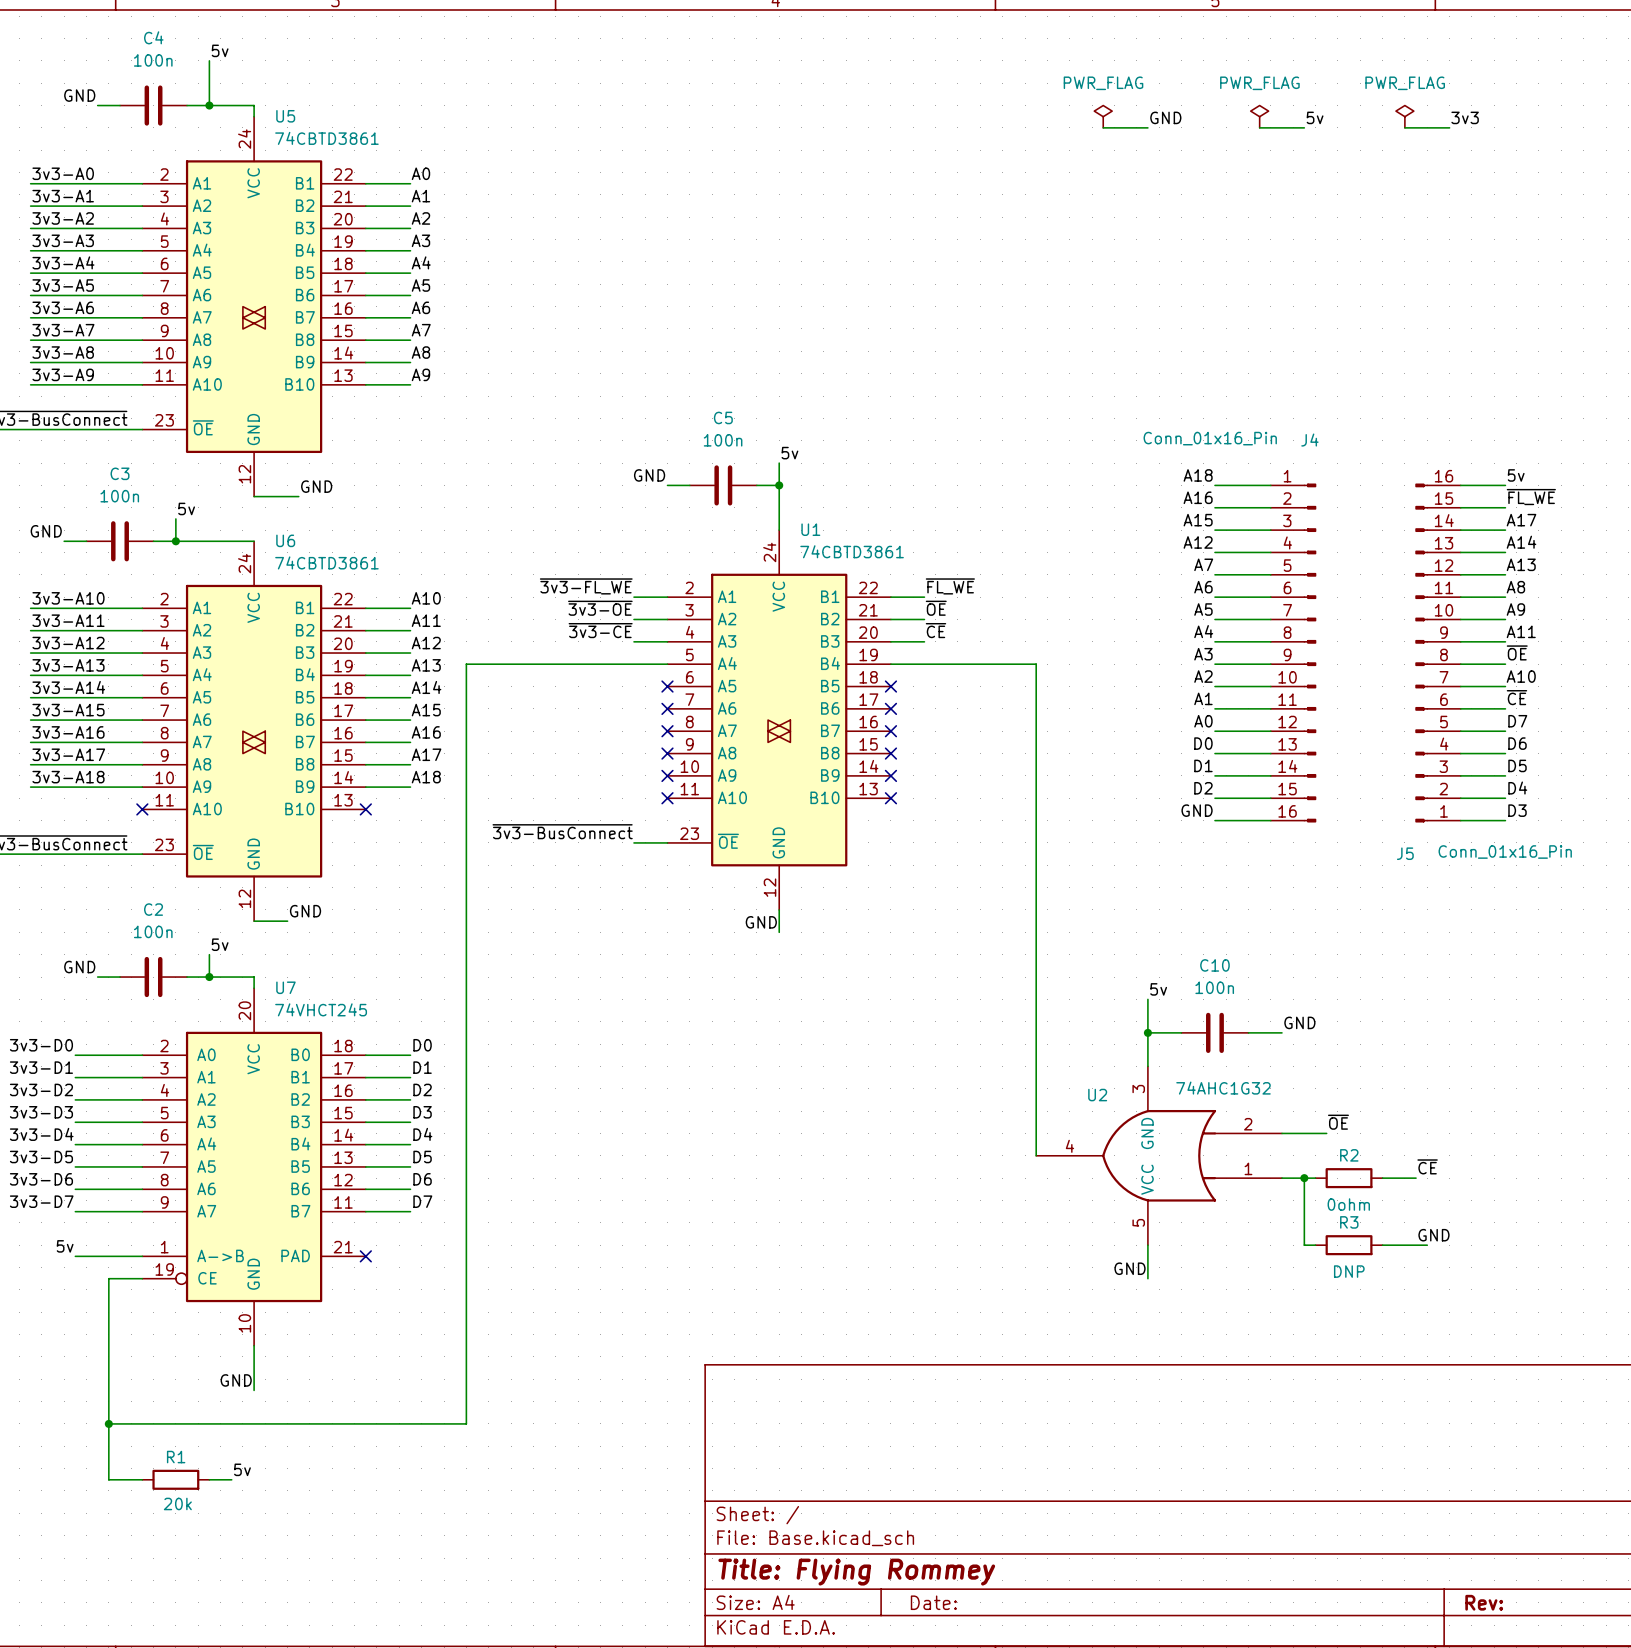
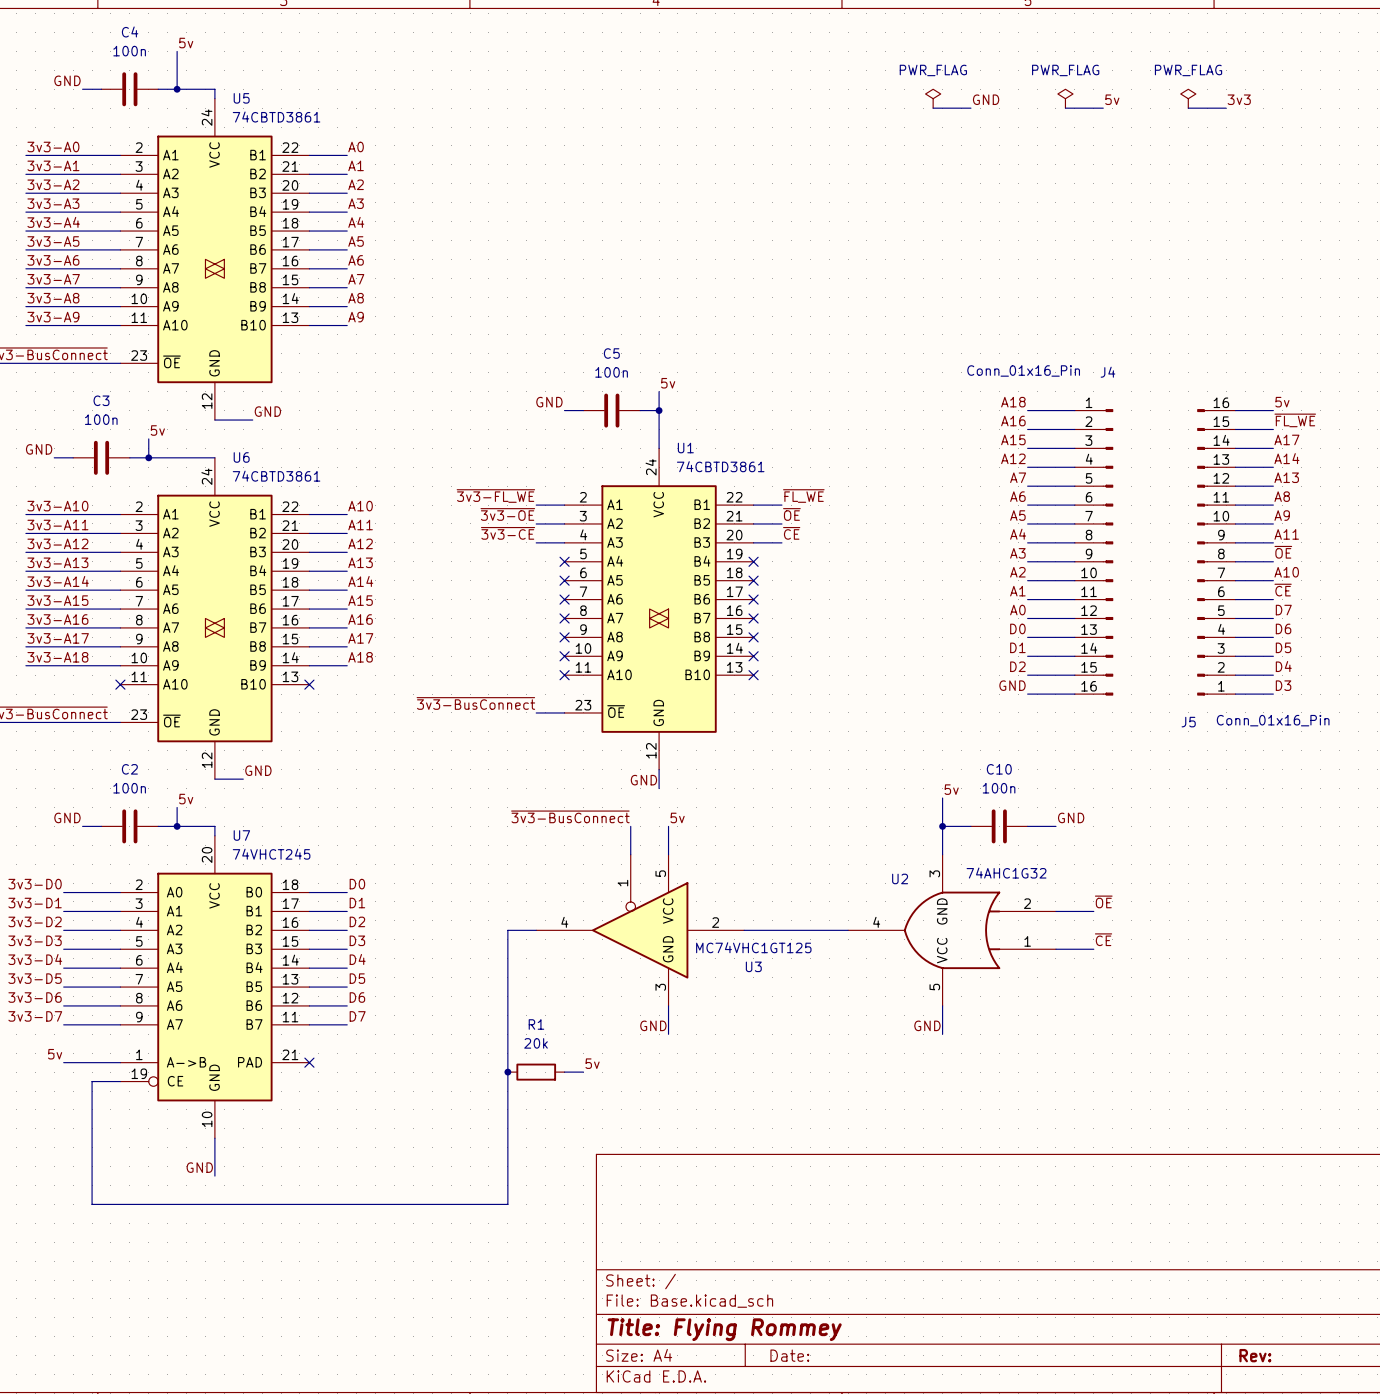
wire: (667, 664) (466, 664) (466, 1423) -> (536, 930) (507, 930) (507, 1204) (394, 1204)
no-connect mark: none -> (564, 561)
wire: (890, 664) (1036, 664) (1036, 1155) -> none
no-connect mark: none -> (753, 561)
label: none -> ~{3v3-BusConnect} (570, 816)
label: none -> 5v (677, 817)
wire: none -> (630, 826) (630, 854)
wire: none -> (668, 826) (668, 854)
junction: none -> (942, 826)
label position: 5v (1158, 989) -> 5v (951, 789)
wire: (1147, 999) (1147, 1066) -> (942, 798) (942, 854)
label position: GND (1299, 1022) -> GND (1071, 817)
wire: (1147, 1032) (1181, 1032) -> (942, 826) (970, 826)
junction: (1147, 1032) -> none
C10 position: (1214, 1032) -> (999, 826)
wire: (1248, 1032) (1281, 1032) -> (1027, 826) (1055, 826)
U3: none -> MC74VHC1GT125 (640, 930)
wire: none -> (744, 930) (848, 930)
label position: ~{OE} (1338, 1122) -> ~{OE} (1103, 901)
wire: (1281, 1133) (1326, 1133) -> (1055, 911) (1093, 911)
U2 position: (1159, 1155) -> (952, 930)
label position: ~{CE} (1427, 1166) -> ~{CE} (1103, 939)
wire: (1281, 1178) (1315, 1178) -> none
wire: (1304, 1178) (1304, 1245) (1315, 1245) -> none
junction: (1304, 1178) -> none
R2: 0ohm (1349, 1178) -> none
wire: (1382, 1178) (1416, 1178) -> none
wire: none -> (668, 1005) (668, 1034)
label: none -> GND (653, 1025)
label: GND (1433, 1235) -> none
wire: (1147, 1245) (1147, 1278) -> (942, 1005) (942, 1034)
R3: DNP (1349, 1245) -> none
wire: (1382, 1245) (1427, 1245) -> (1055, 949) (1093, 949)
label: none -> 5v (592, 1063)
junction: none -> (507, 1072)
wire: none -> (564, 1072) (583, 1072)
label position: GND (1130, 1268) -> GND (927, 1025)
wire: (108, 1423) (108, 1479) (142, 1479) -> none
junction: (108, 1423) -> none
R1 name position: R1 (176, 1457) -> R1 (536, 1024)
label: 5v (242, 1469) -> none
R1 position: (175, 1479) -> (536, 1072)
wire: (209, 1479) (231, 1479) -> none
R1 value position: 20k (177, 1503) -> 20k (536, 1043)

